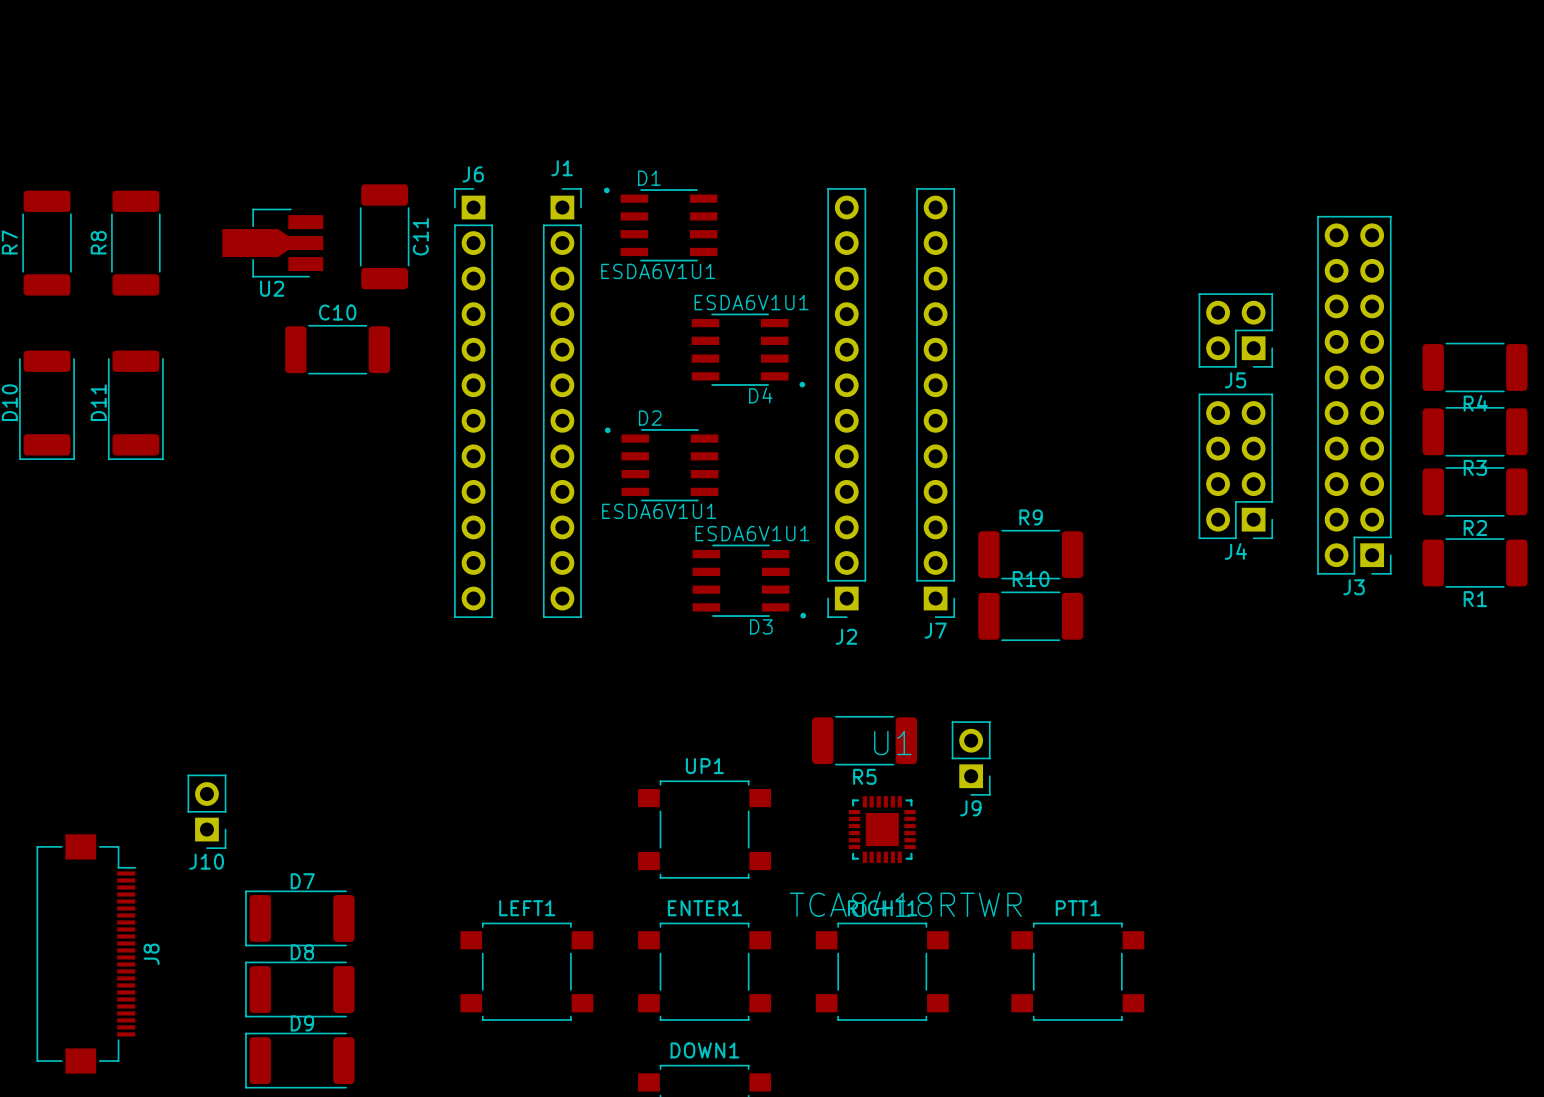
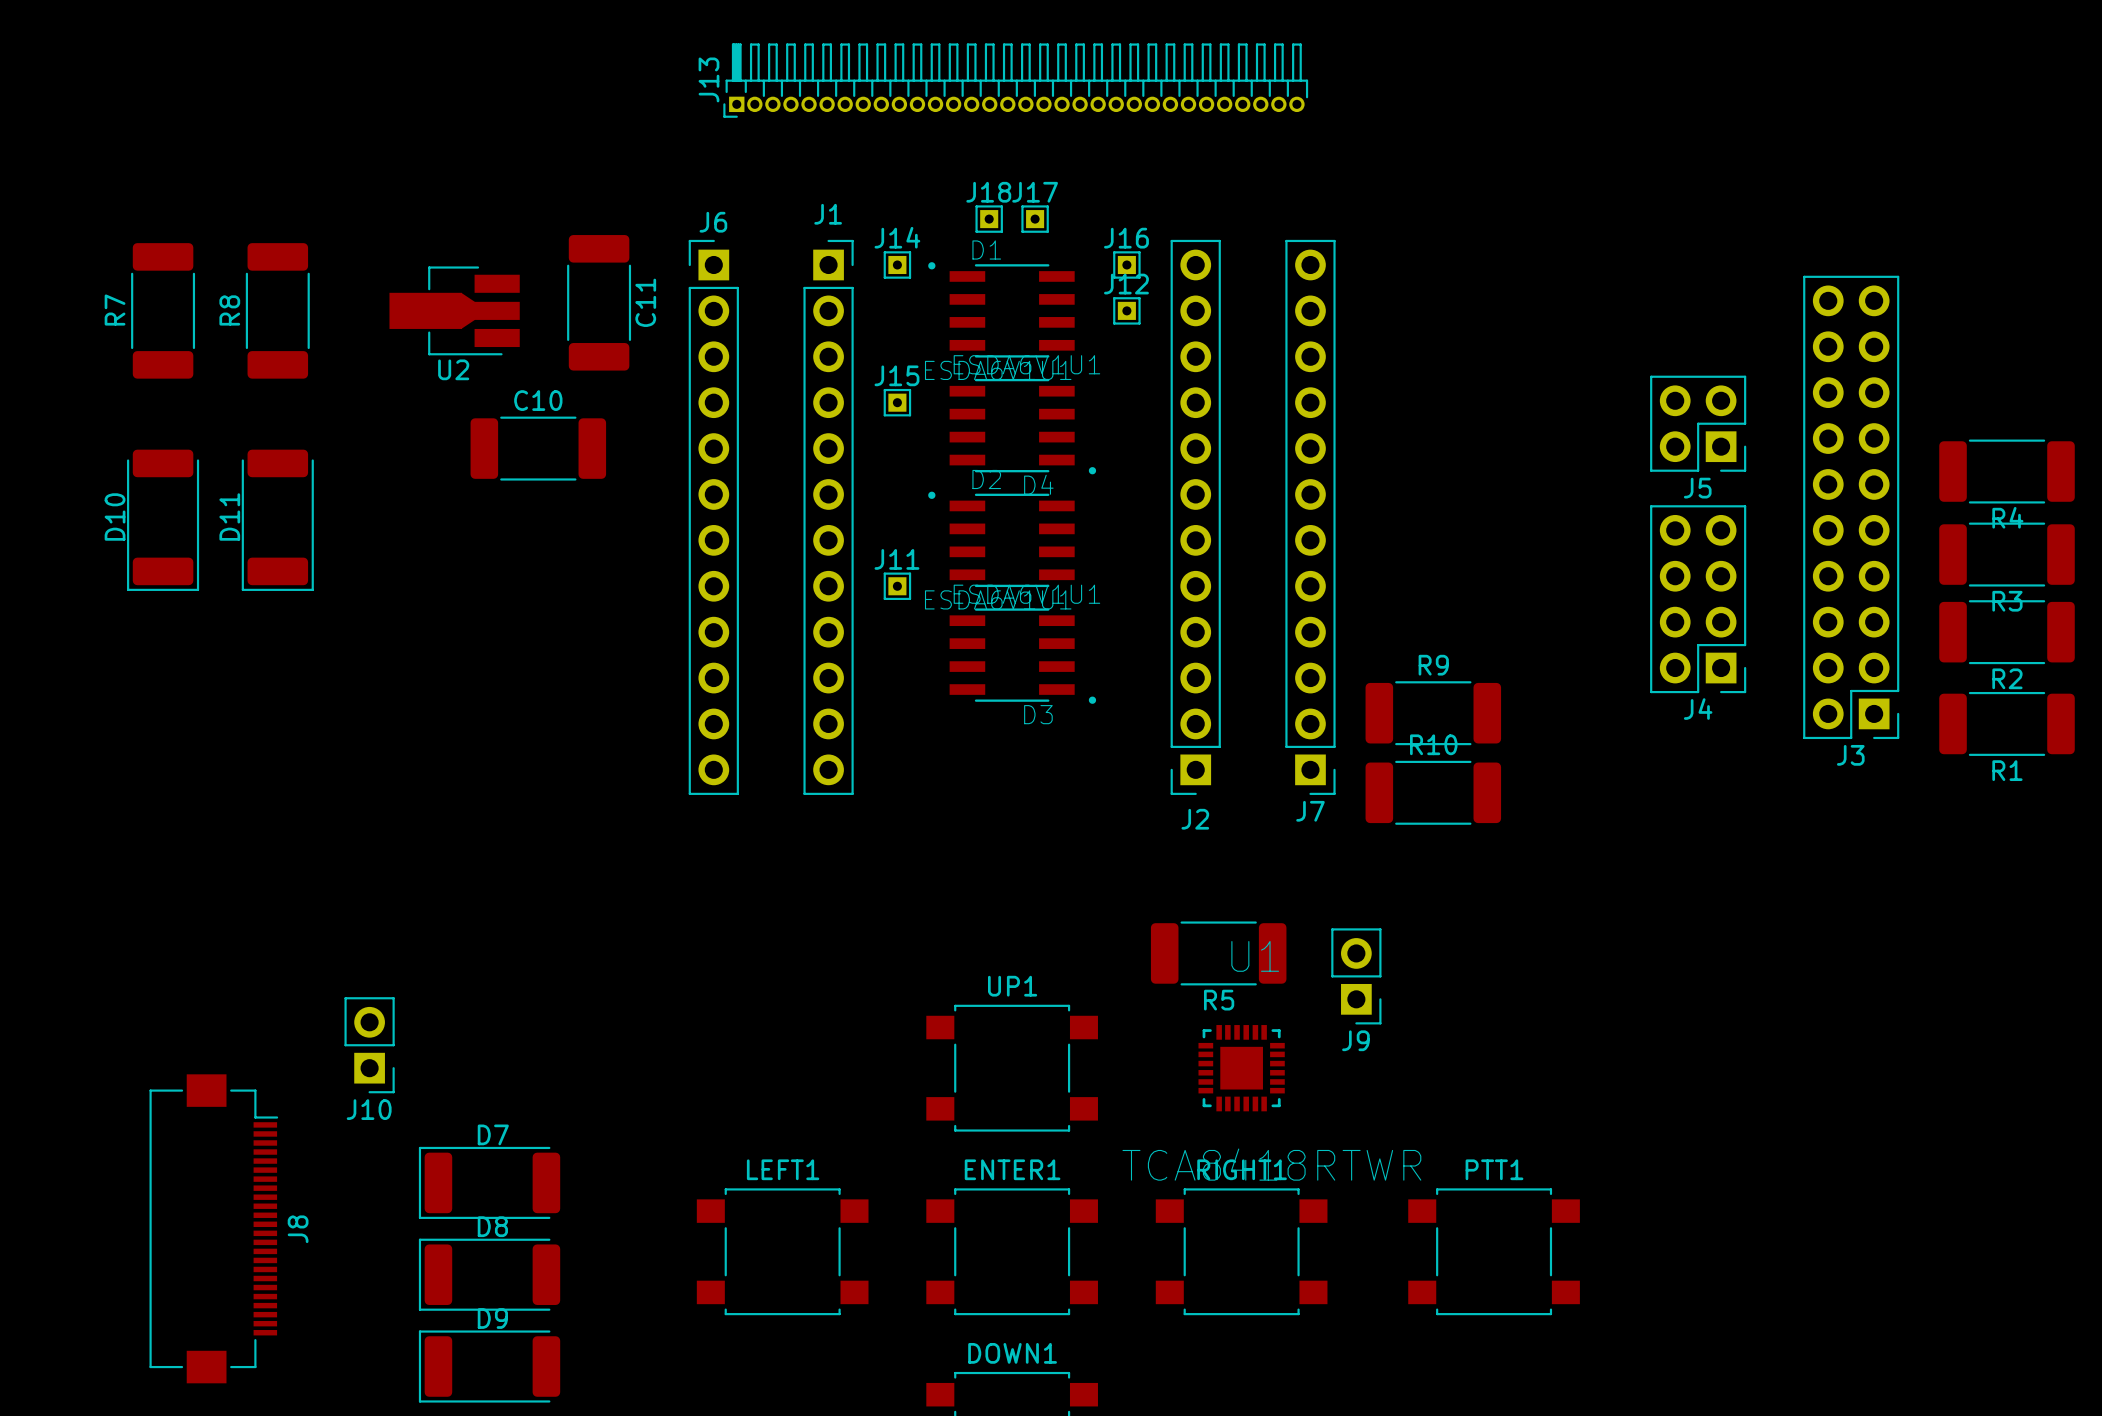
J13: none -> (1015, 80)
J18: none -> (989, 219)
J17: none -> (1035, 219)
J14: none -> (897, 264)
J16: none -> (1126, 264)
D1 position: (660, 224) -> (1001, 309)
J12: none -> (1126, 310)
J15: none -> (897, 402)
D4 position: (748, 350) -> (1022, 426)
J11: none -> (897, 586)
D2 position: (661, 464) -> (1001, 539)
D3 position: (749, 581) -> (1022, 656)

